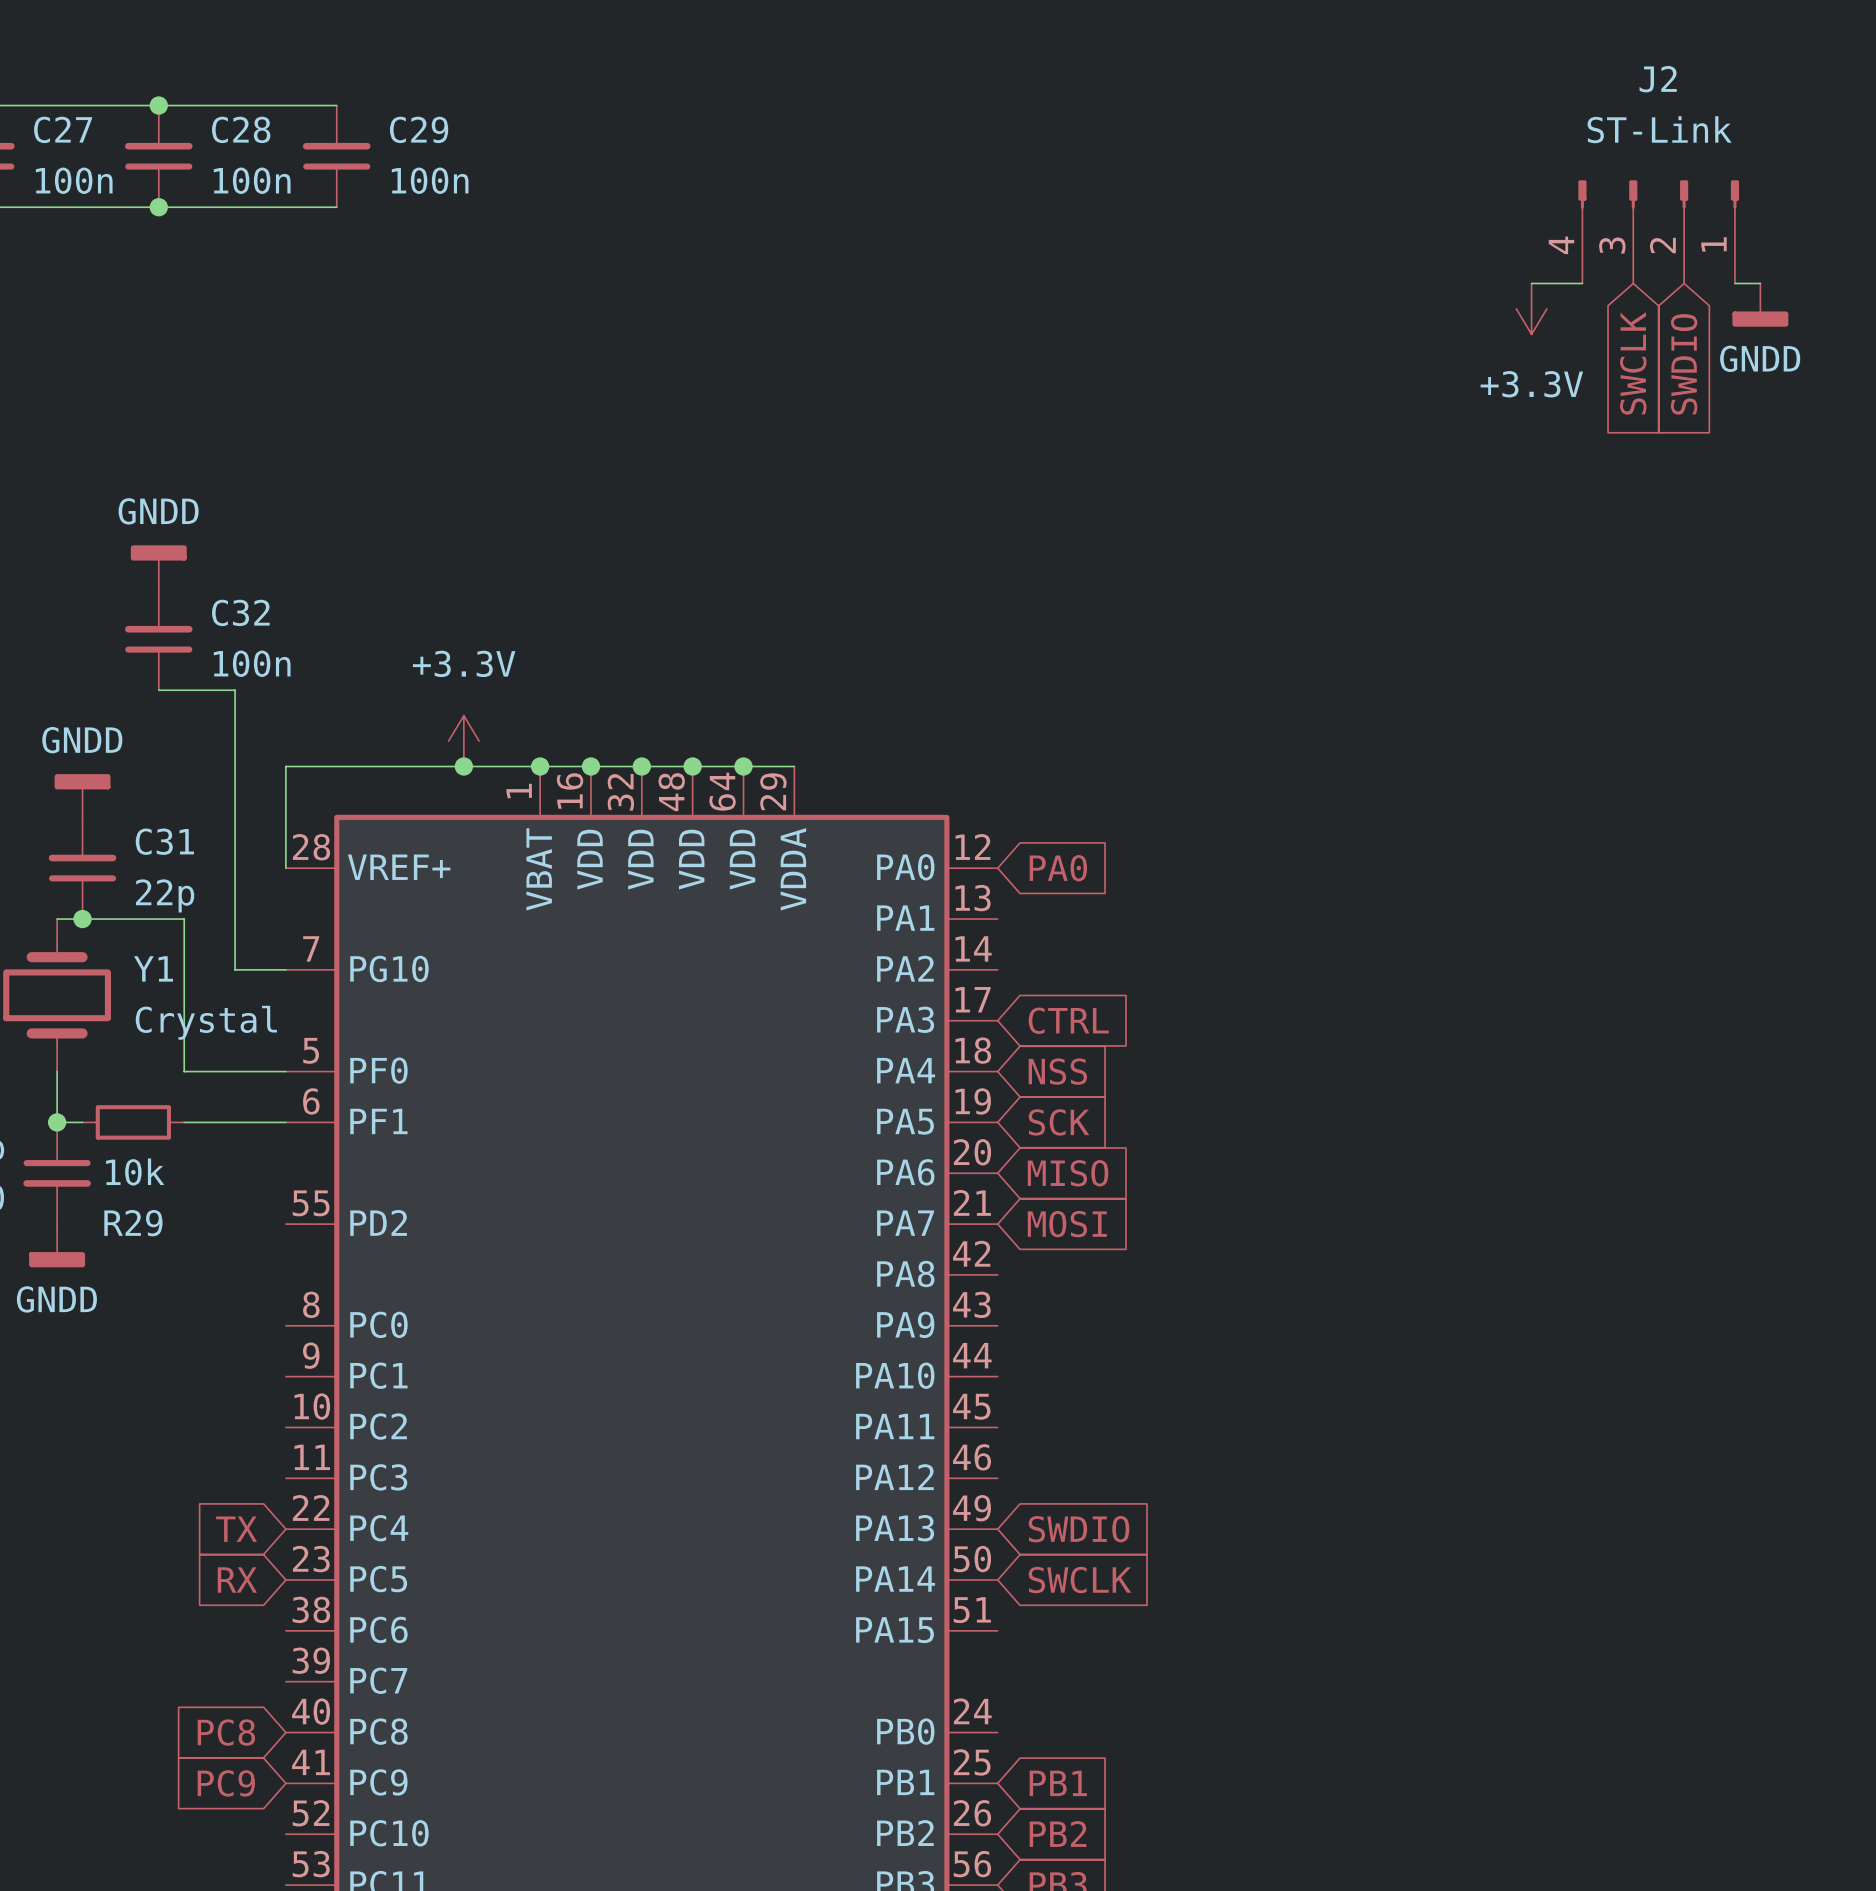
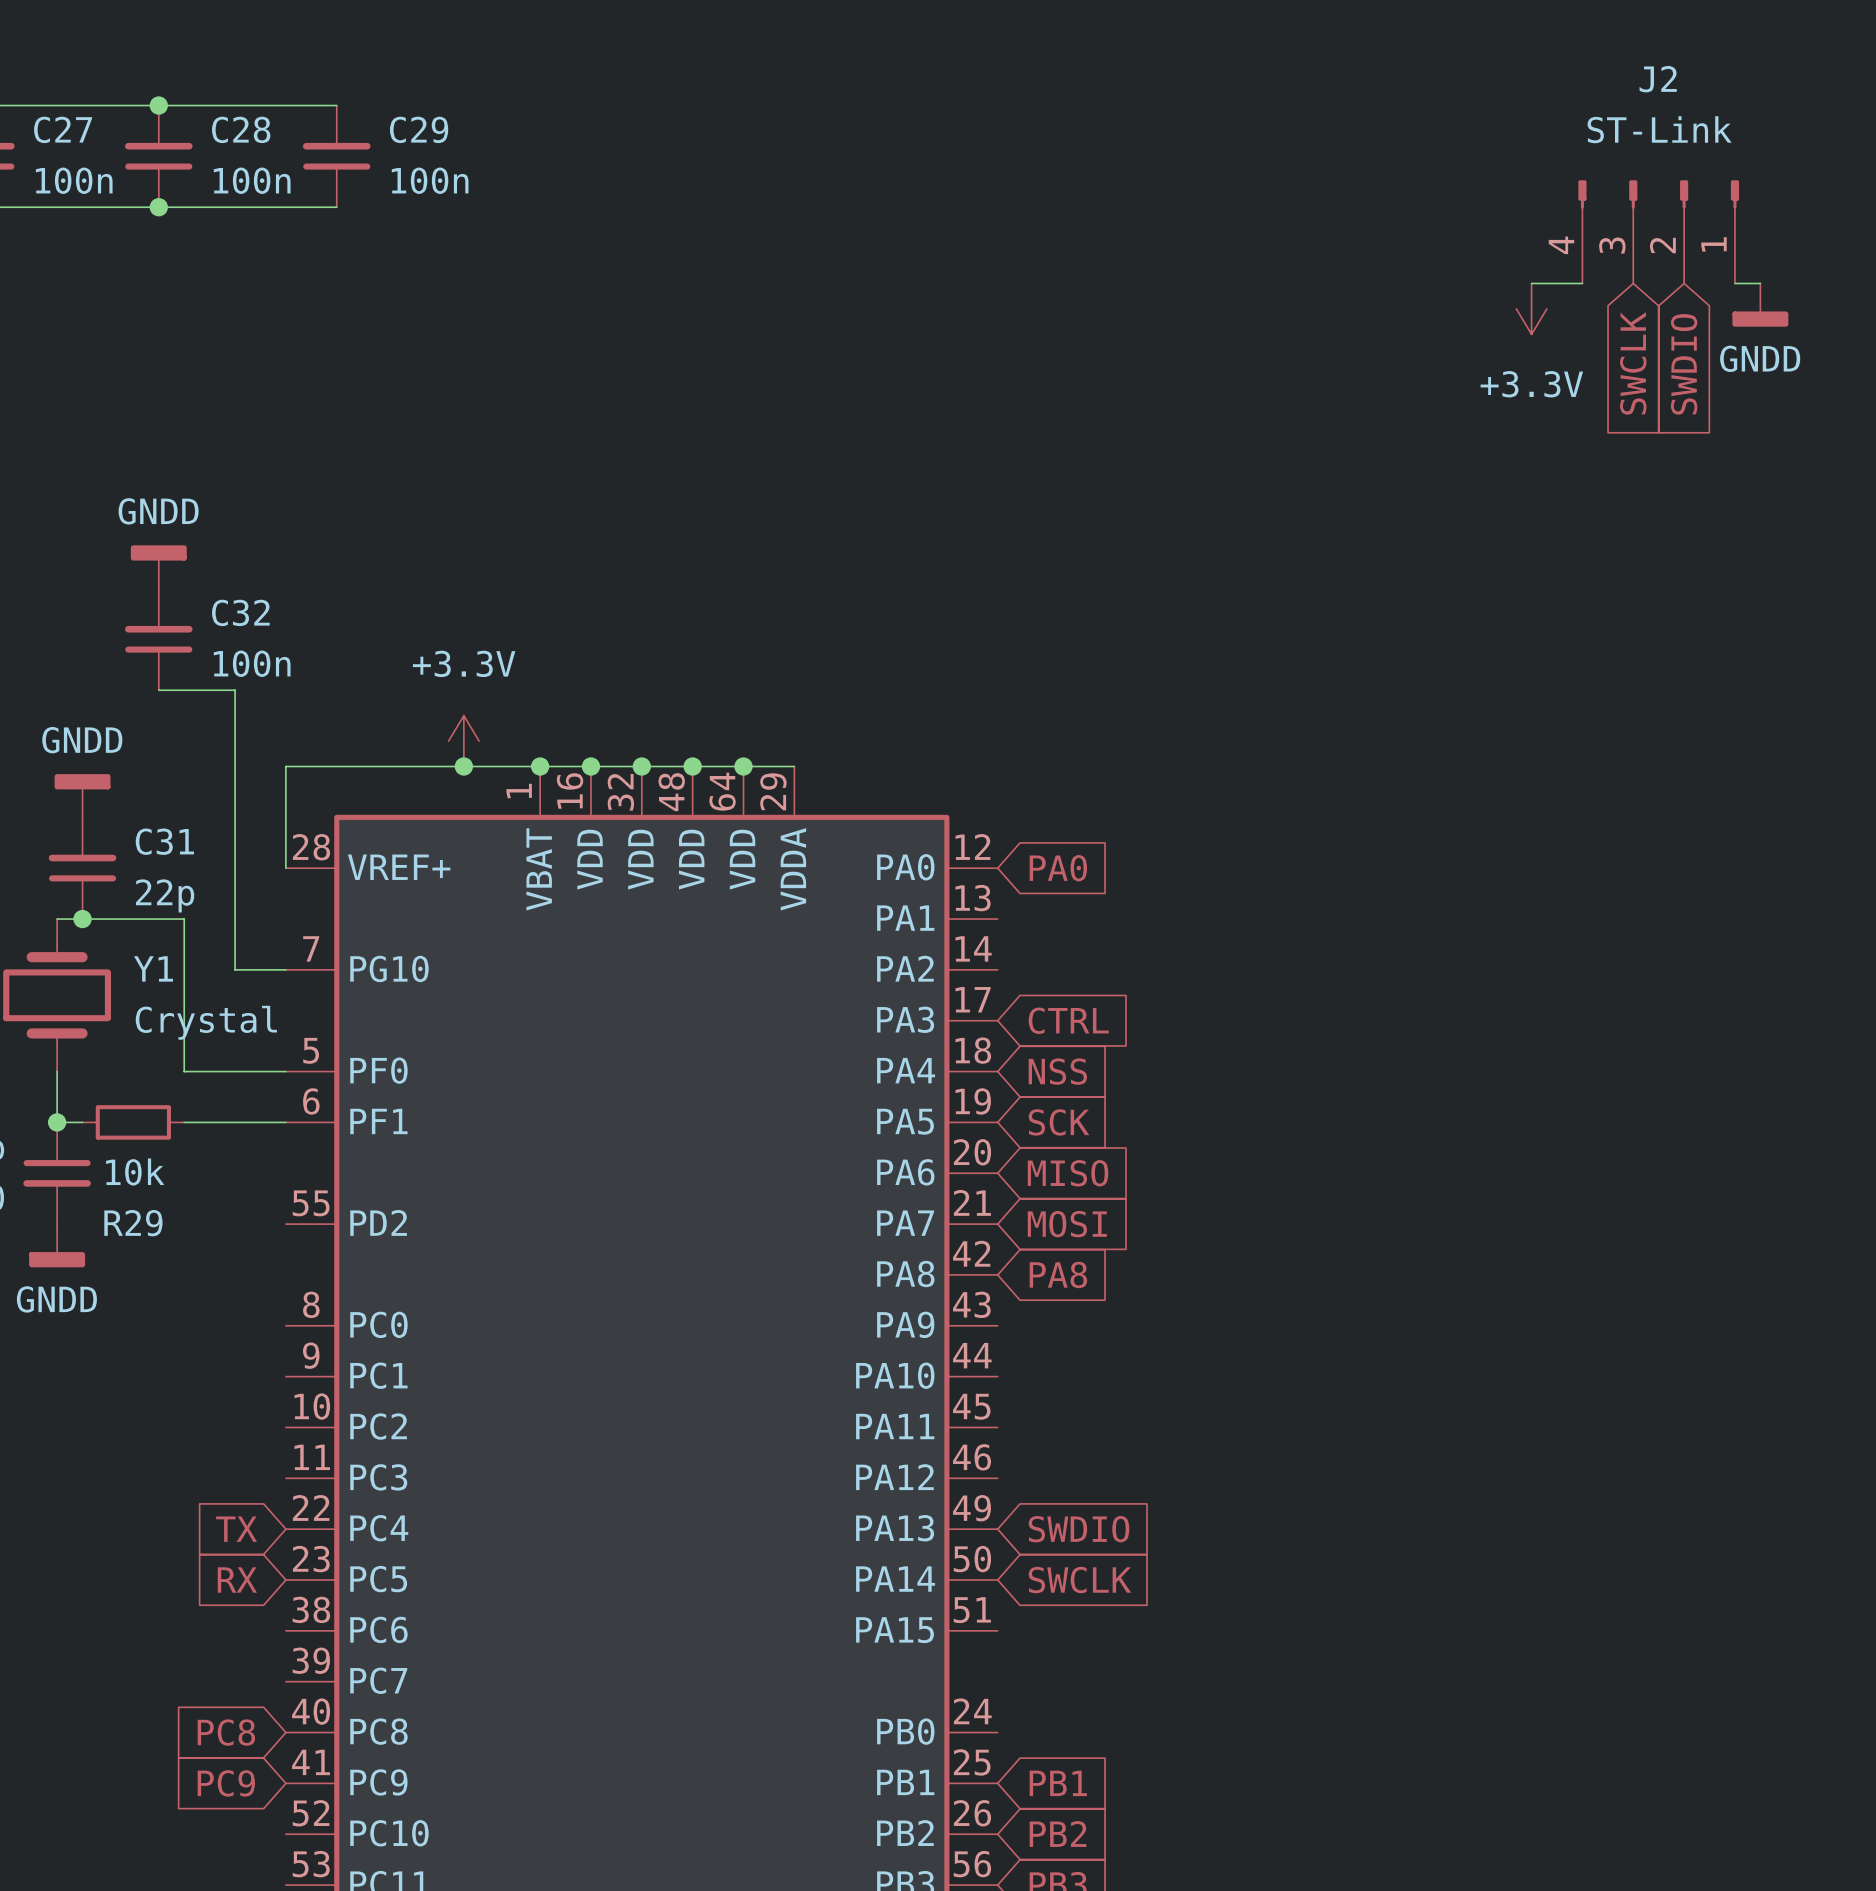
global label: none -> PA8 (1058, 1274)

